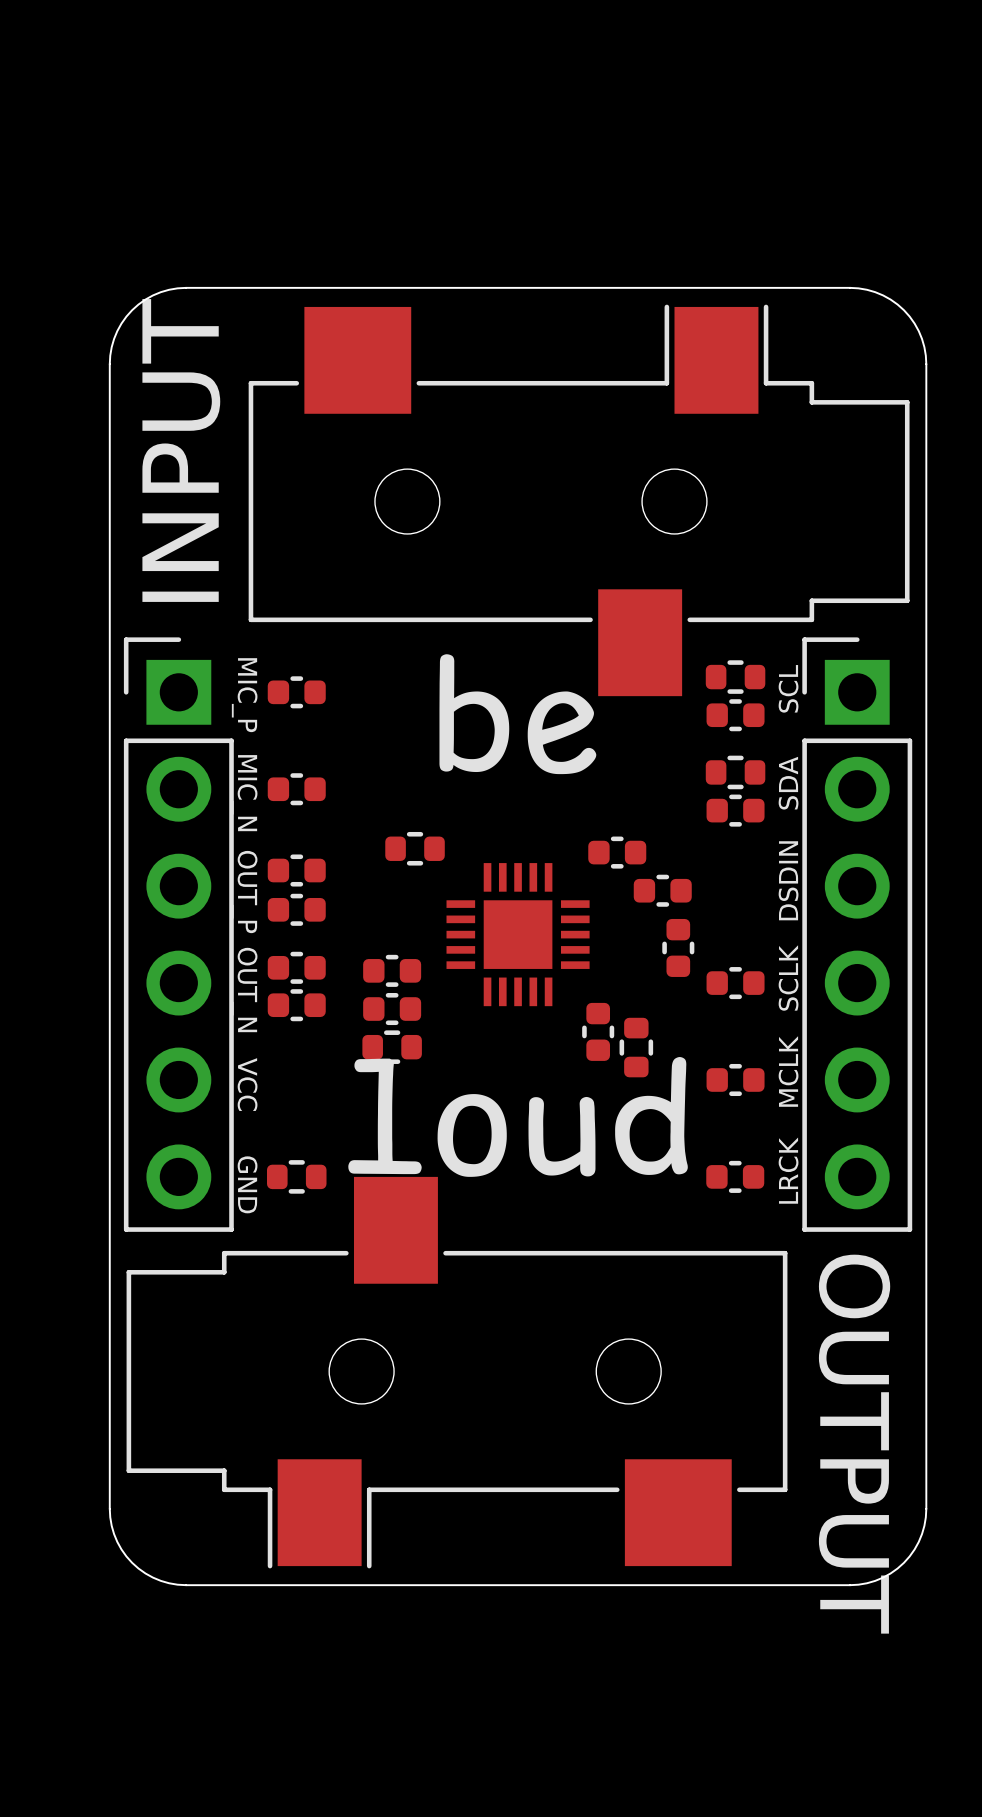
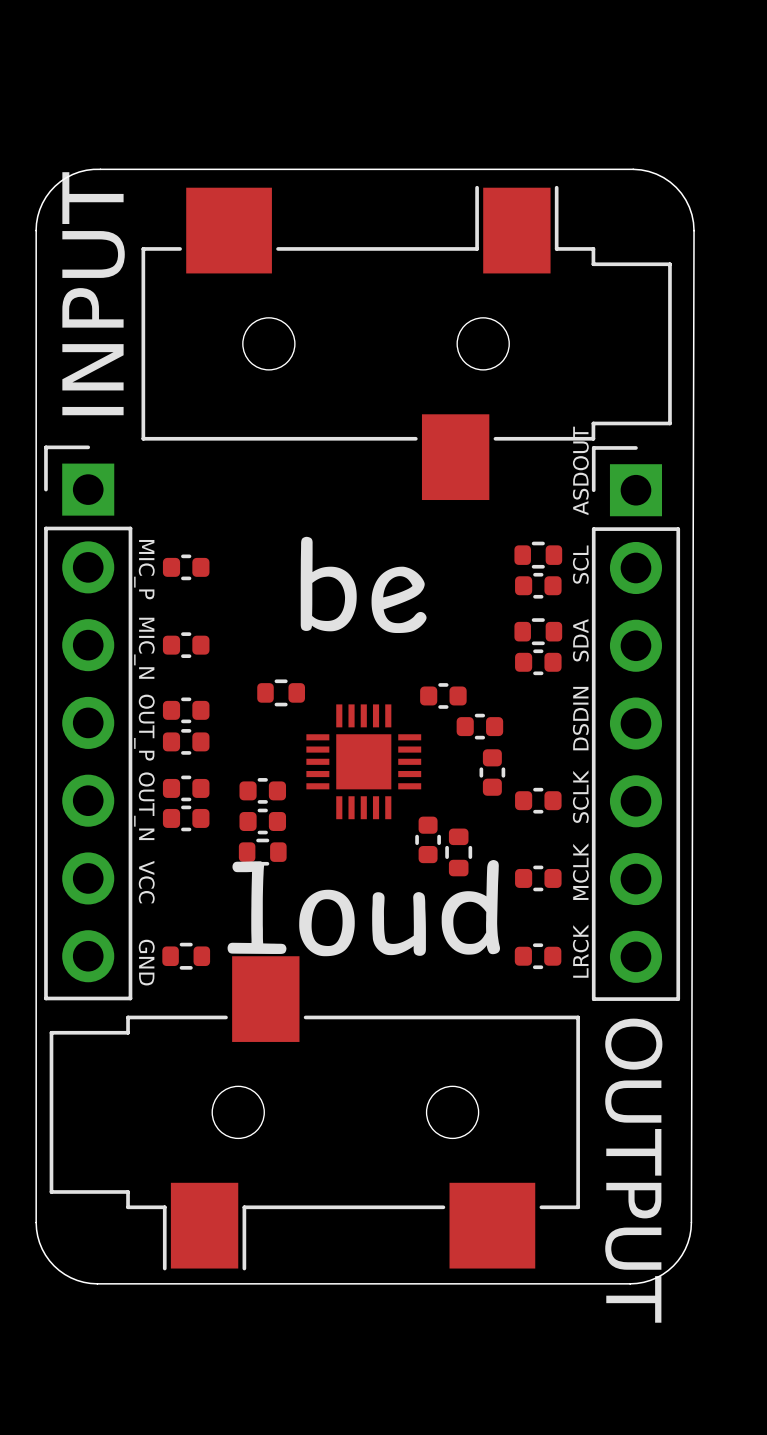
board edge: (109, 364) (114, 338) (126, 316) (145, 299) (160, 292) (177, 288) (850, 287) (866, 289) (883, 295) (897, 304) (909, 316) (922, 338) (926, 364) (926, 1508) -> (36, 304) (36, 230) (39, 209) (50, 191) (60, 181) (72, 174) (86, 170) (633, 169) (648, 171) (663, 177) (681, 193) (691, 214) (694, 230) (691, 1222)
text position: INPUT (181, 450) -> INPUT (93, 293)
part position: (579, 500) -> (406, 342)
text: none -> ASDOUT (580, 470)
part: none -> (88, 722)
part: none -> (635, 723)
part: (178, 934) -> none
part: (857, 934) -> none

